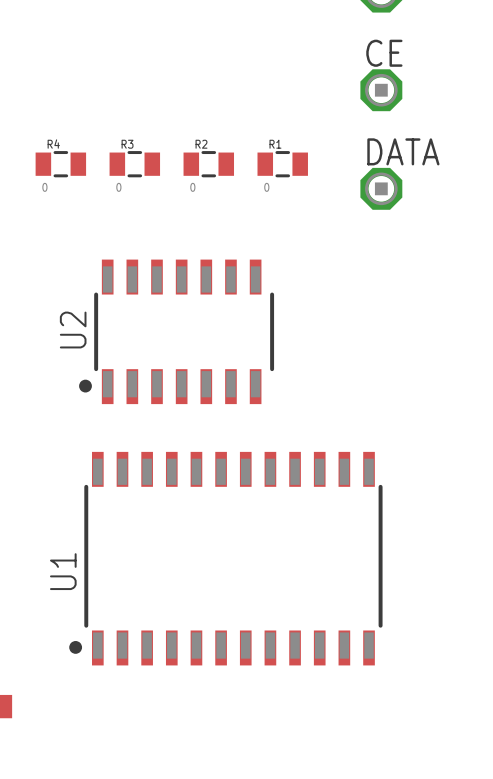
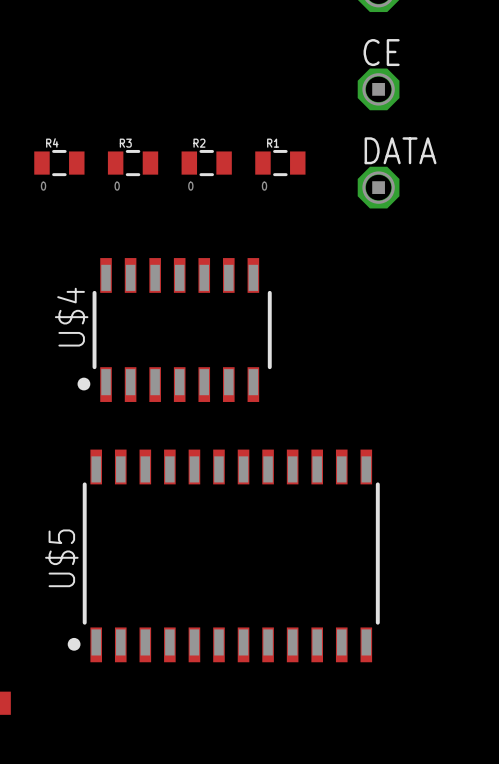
U2 name: U2 (73, 330) -> U$4 (71, 317)
U1 name: U1 (63, 571) -> U$5 (61, 558)

